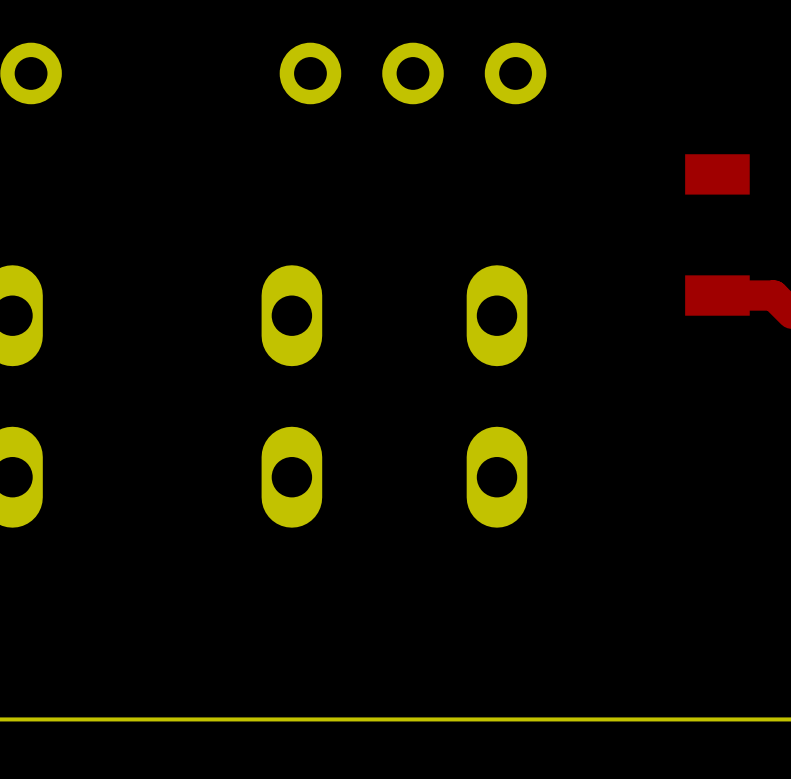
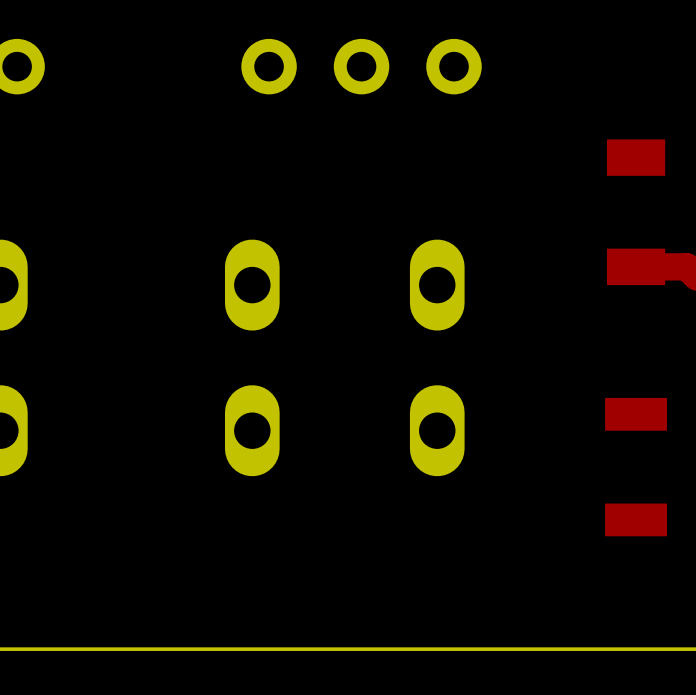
part: none -> (636, 467)

